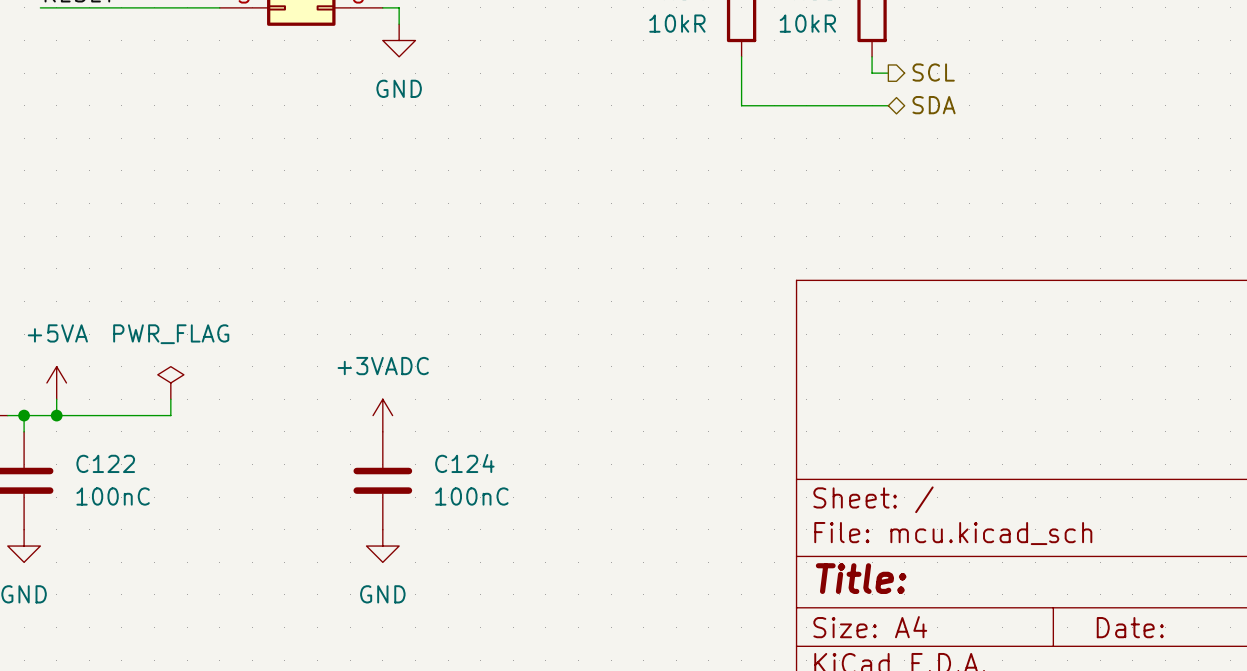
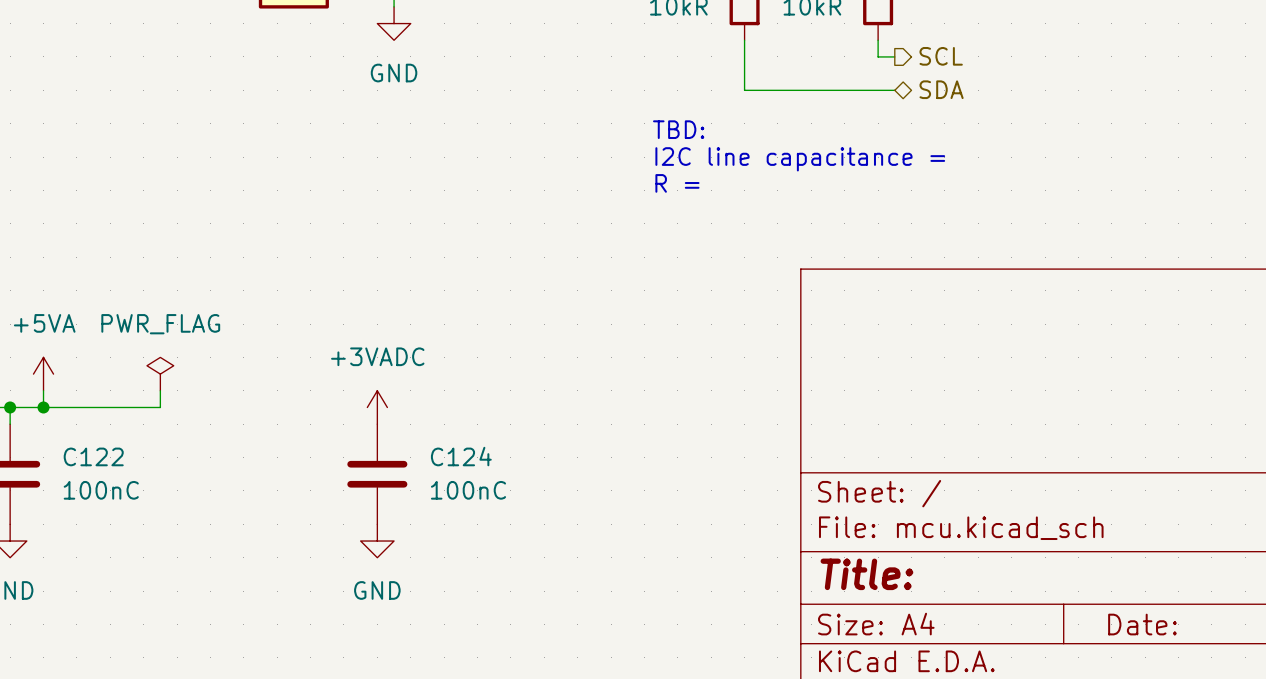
text: none -> TBD: (678, 129)
text: none -> I2C line capacitance = (800, 159)
text: none -> R = (677, 183)

